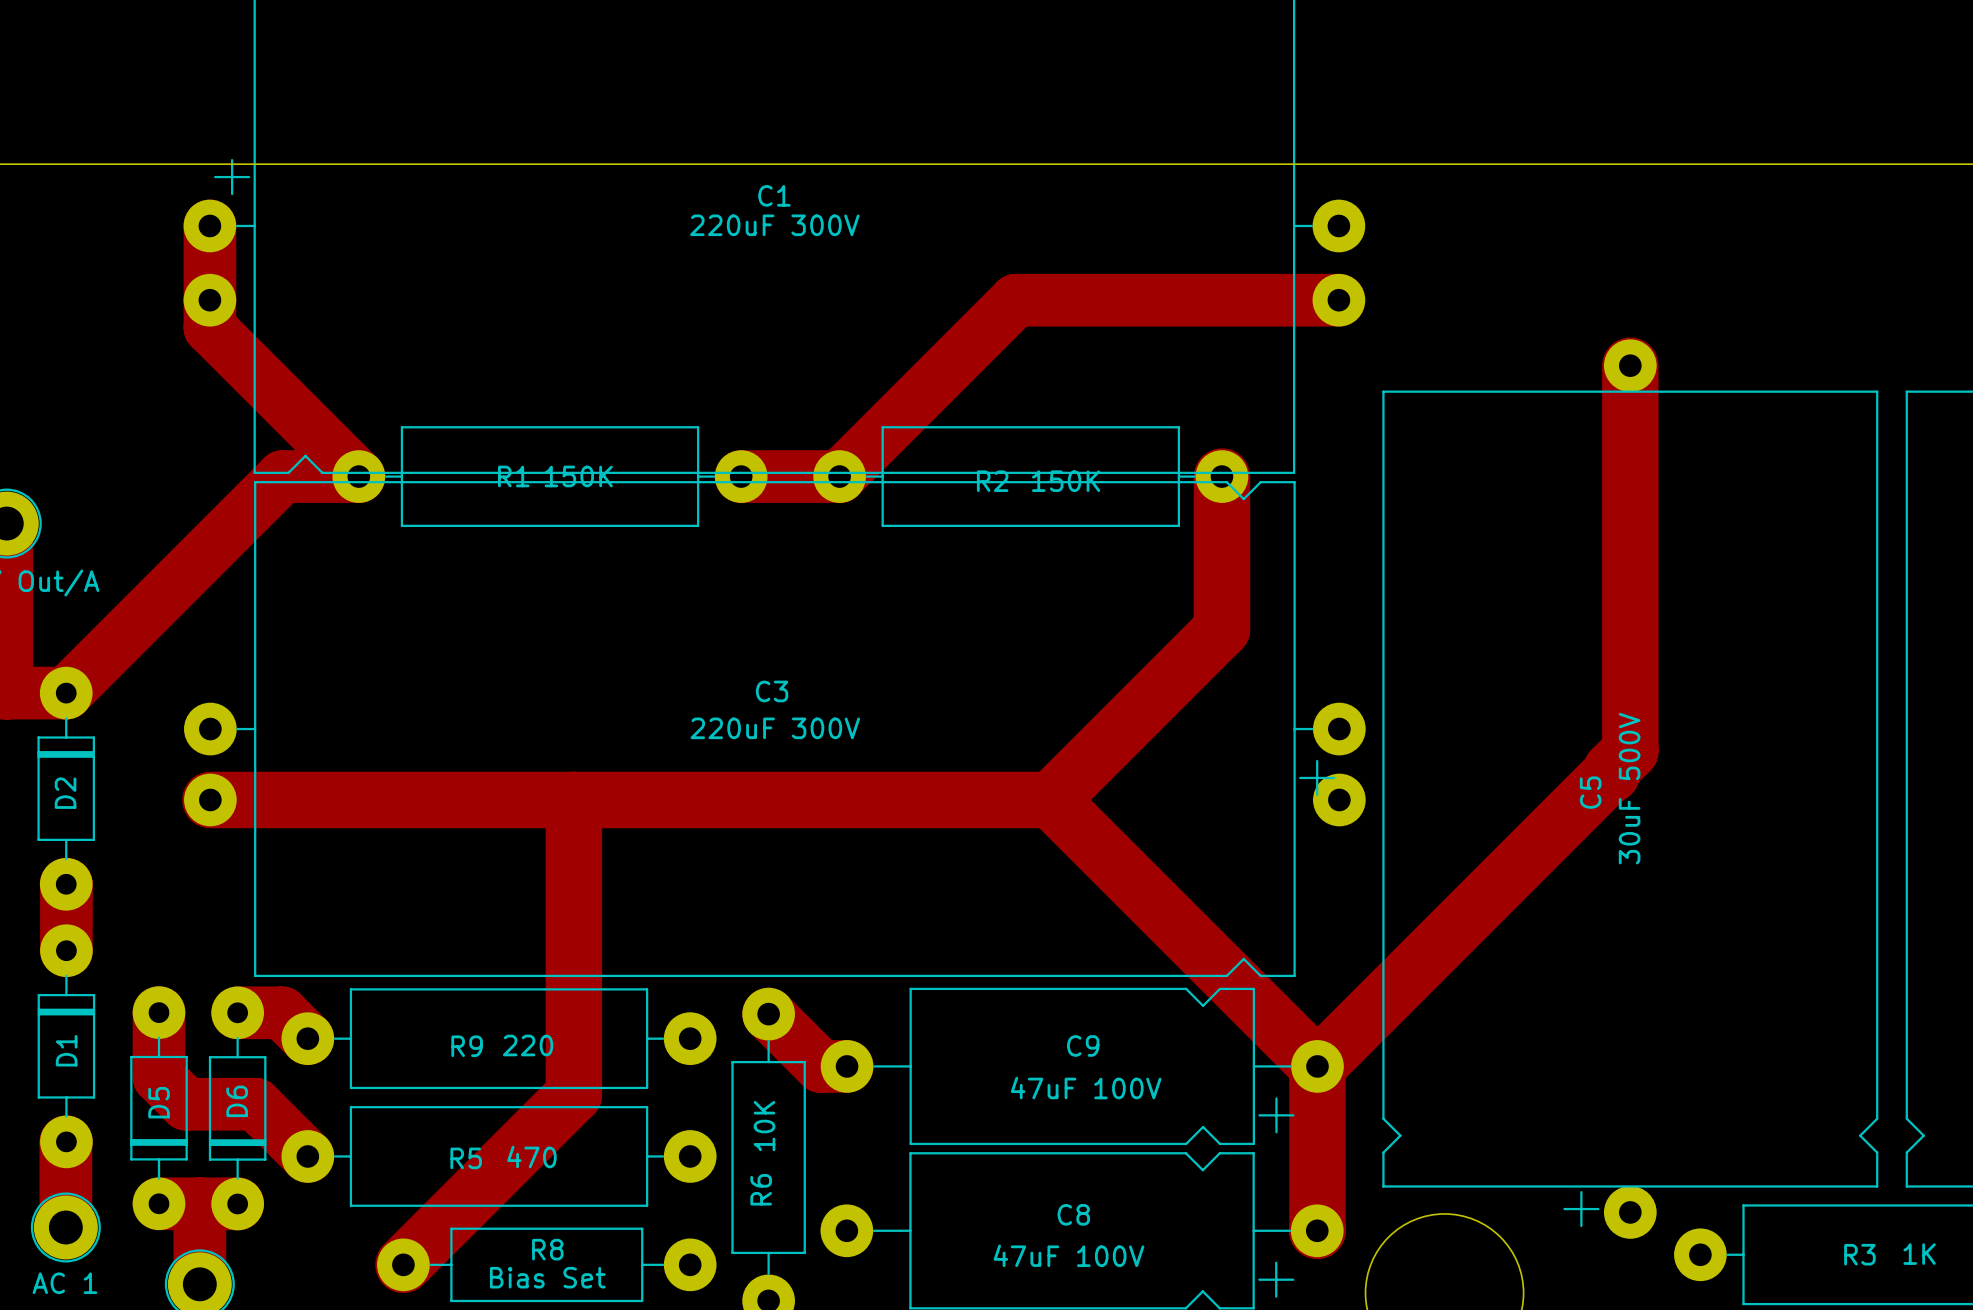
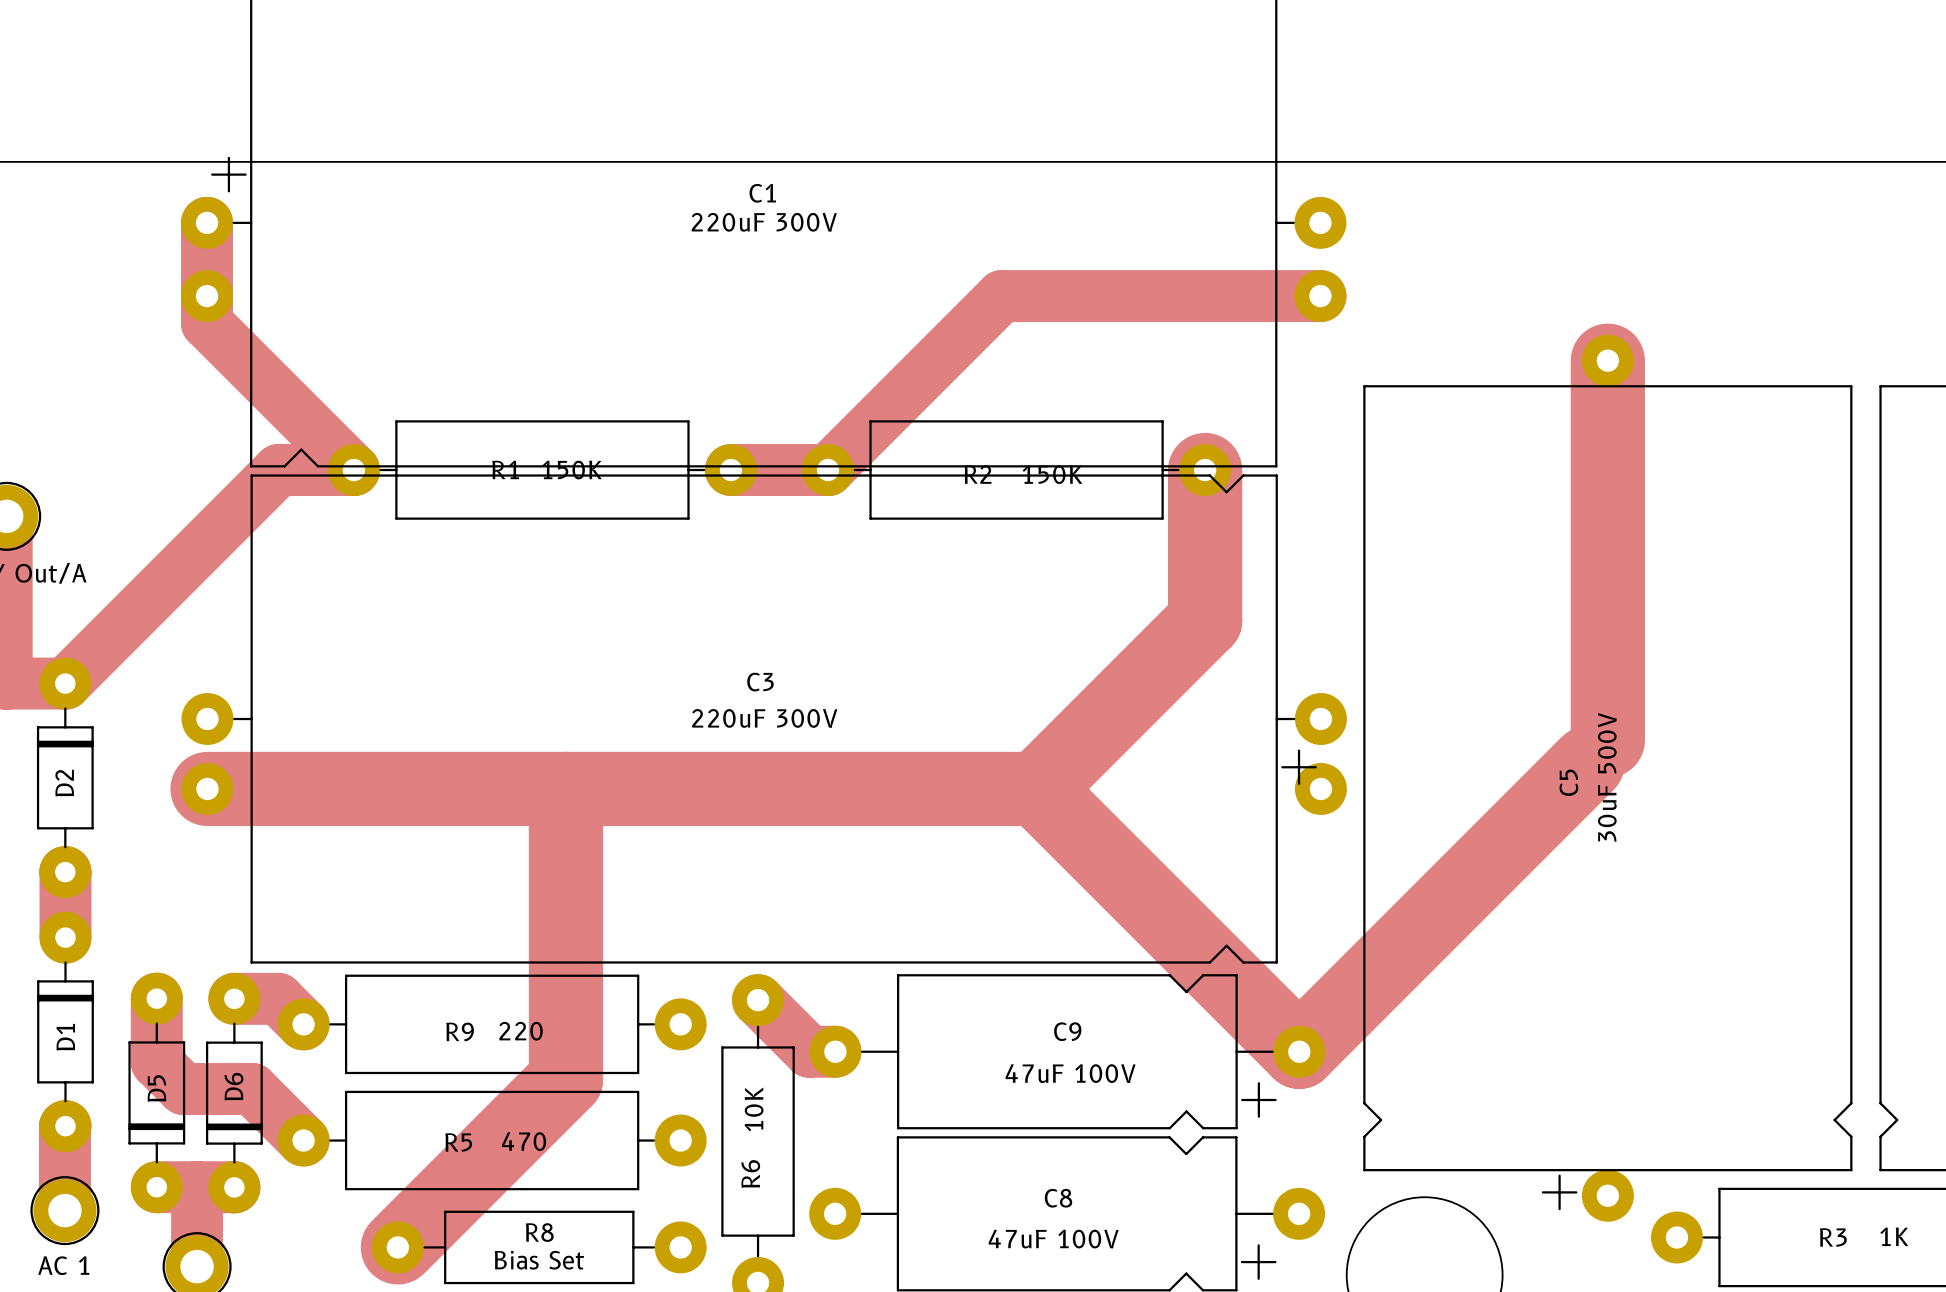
track width: thin (1630, 365) (1630, 750) -> thick (1607, 360) (1607, 740)
track width: thin (1221, 476) (1221, 629) (1051, 799) -> thick (1205, 470) (1205, 620) (1036, 788)
track width: thin (1609, 774) (1317, 1066) (1051, 799) -> thick (1587, 763) (1299, 1051) (1036, 788)
track width: thin (210, 799) (1051, 799) -> thick (207, 788) (1036, 788)
track width: thin (573, 799) (573, 1094) (403, 1264) -> thick (566, 788) (566, 1079) (397, 1247)
track: (1317, 1066) (1317, 1230) -> none

